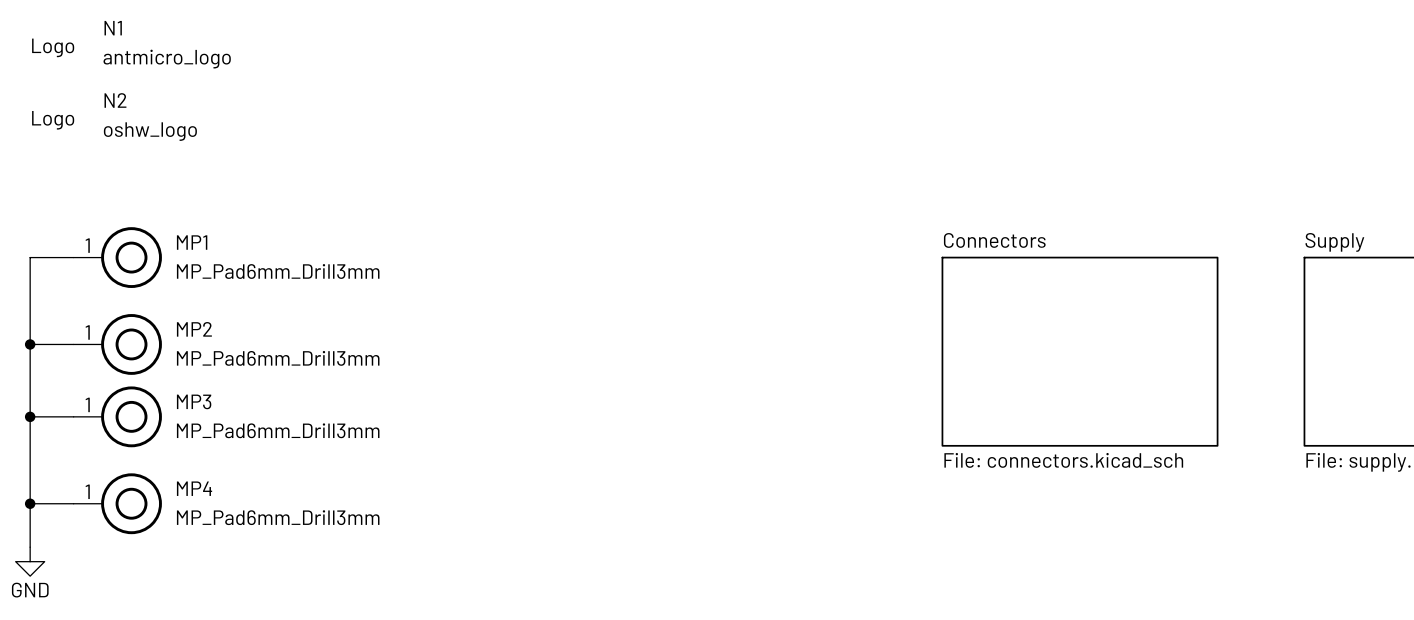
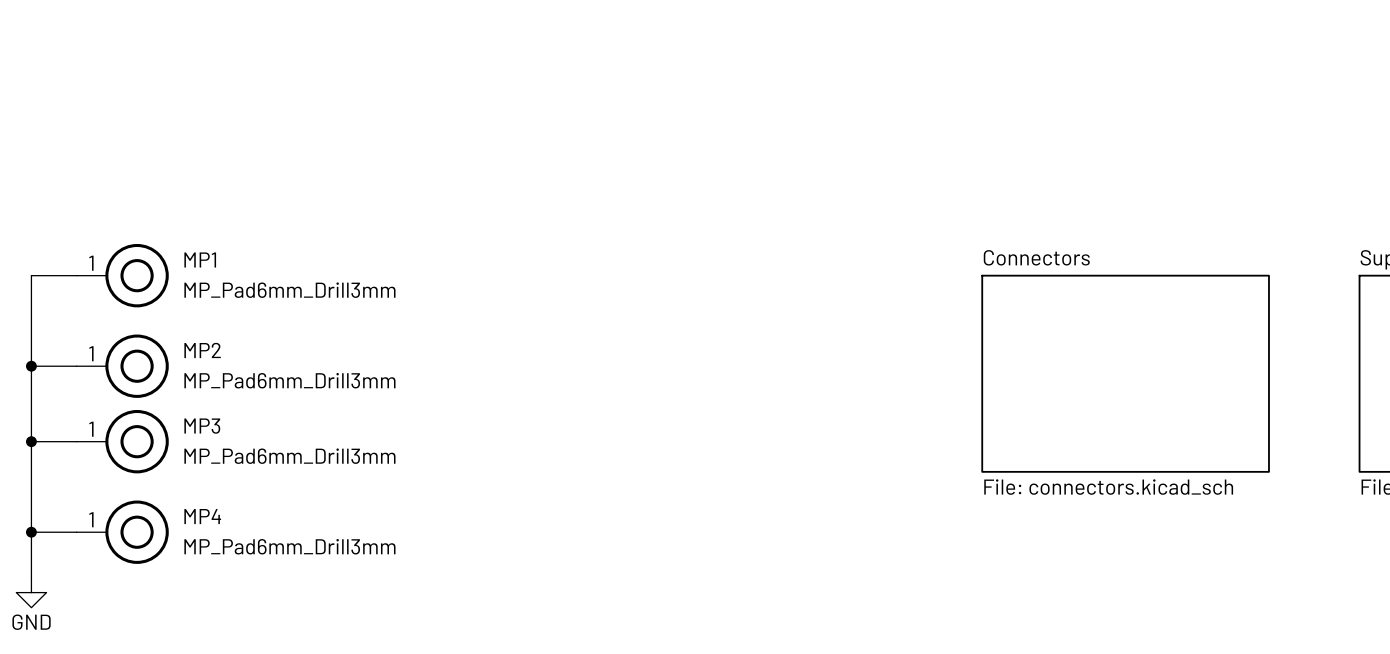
N1: antmicro_logo (131, 44) -> none
N2: oshw_logo (114, 117) -> none

